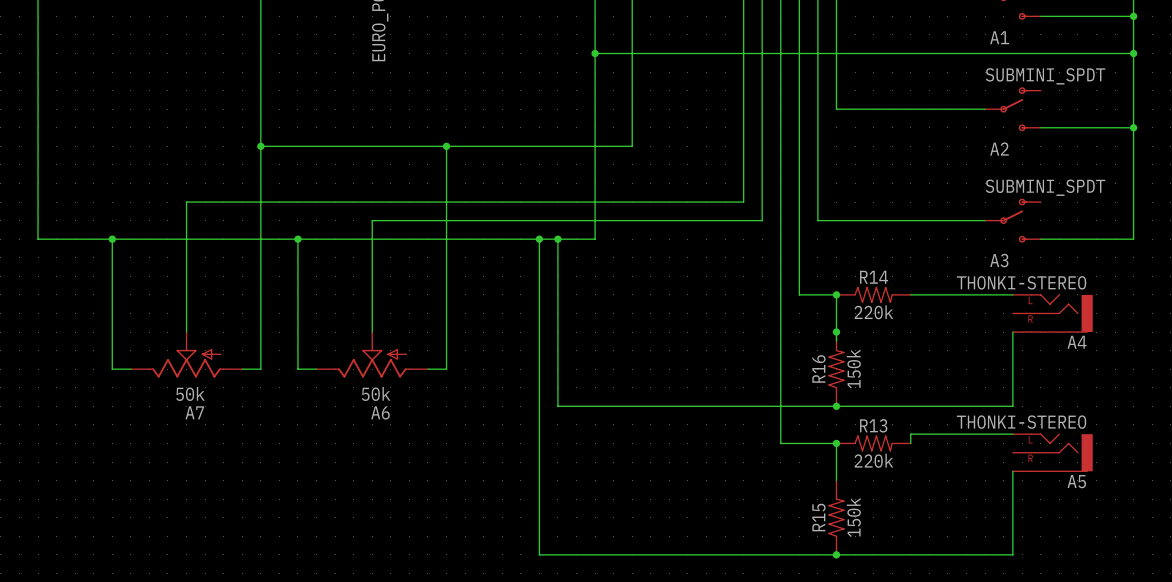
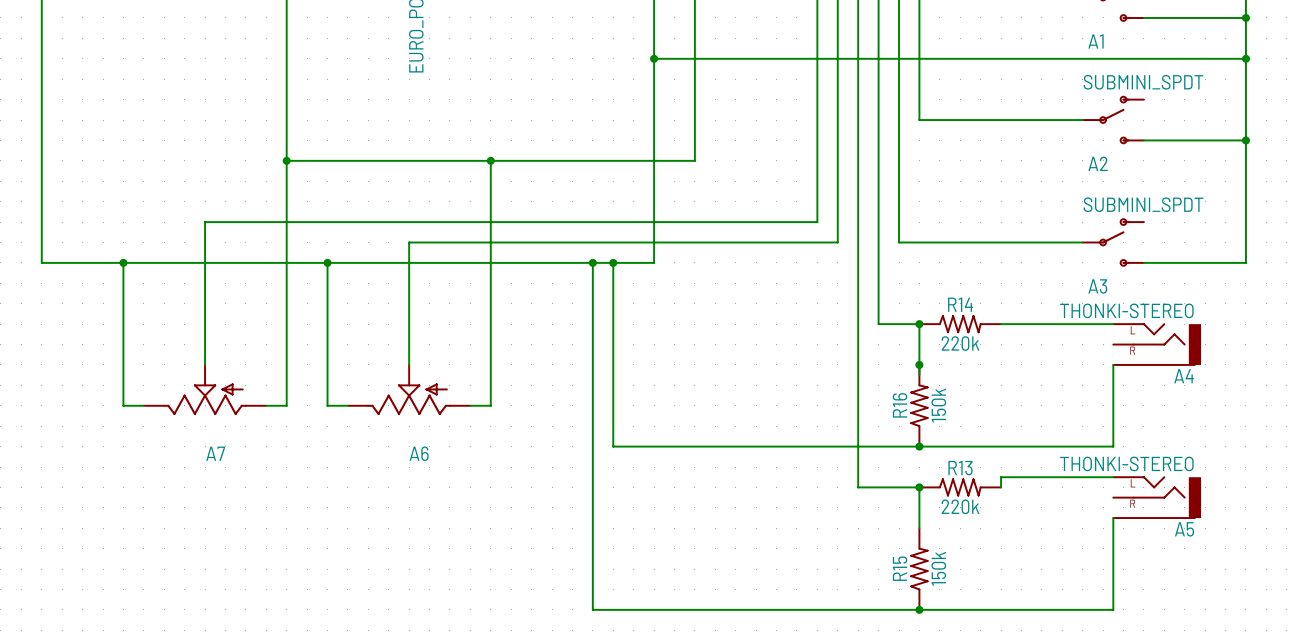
A7 value: 50k (190, 393) -> none
A6 value: 50k (376, 393) -> none

